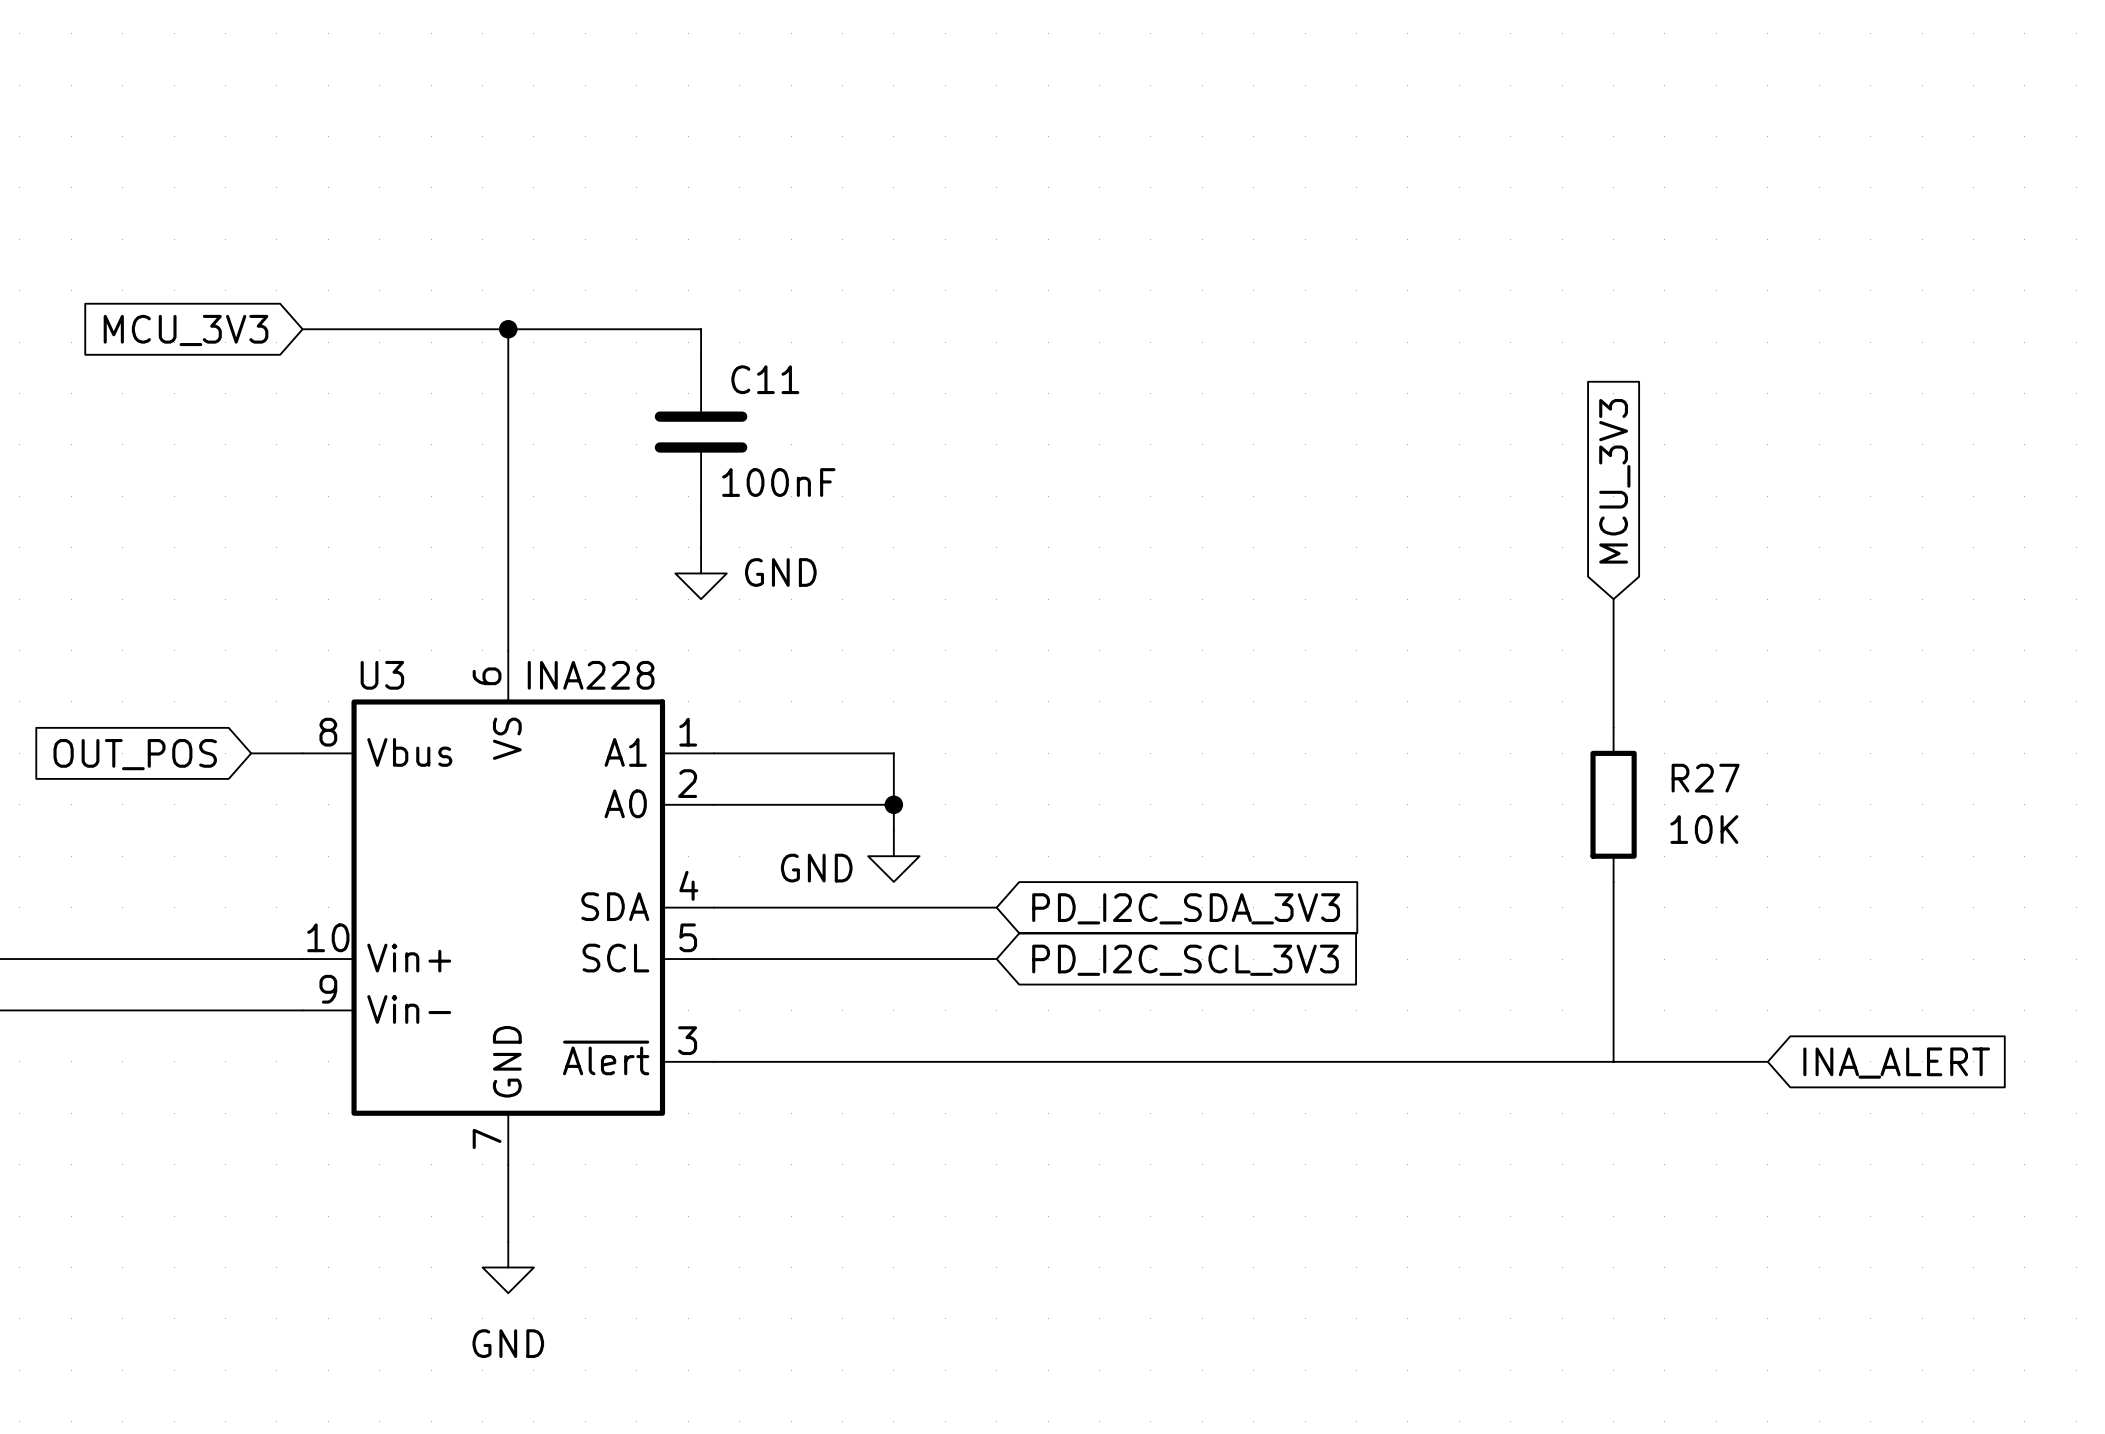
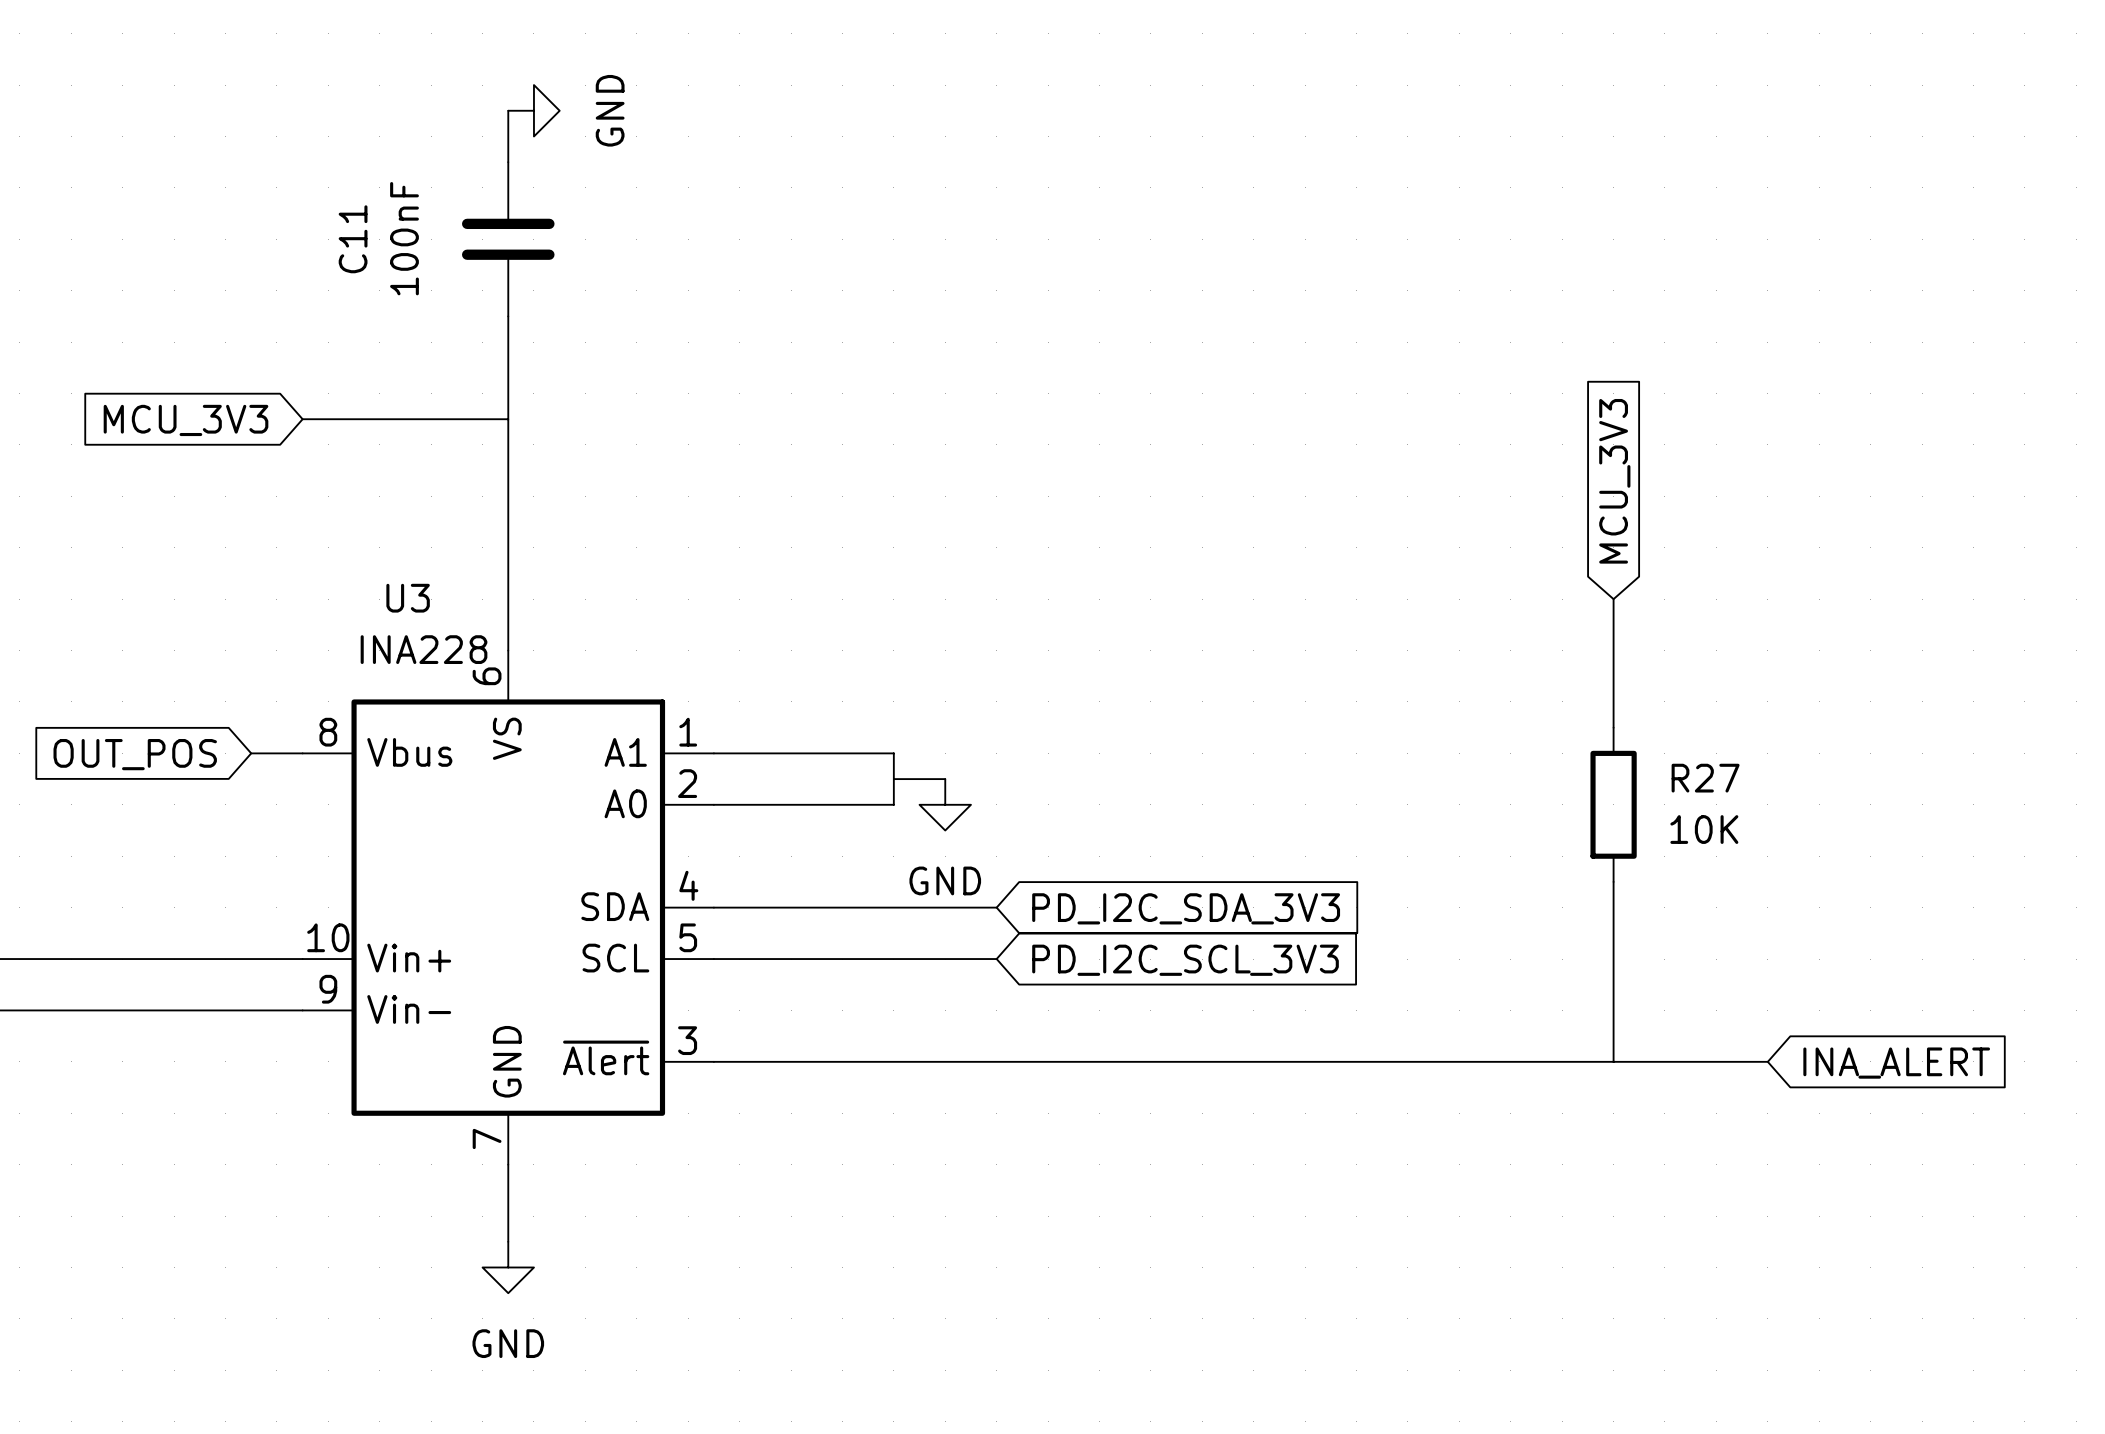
wire: none -> (508, 110) (508, 162)
power symbol: none -> GND (533, 110)
wire: (302, 329) (701, 329) (701, 354) -> none
junction: (508, 329) -> none
global label position: MCU_3V3 (186, 330) -> MCU_3V3 (186, 420)
C11 name rotation: 0° (765, 379) -> 90° counterclockwise (353, 239)
C11 name position: C11 (765, 379) -> C11 (353, 239)
wire: none -> (302, 419) (508, 419)
C11 position: (701, 432) -> (508, 239)
C11 value rotation: 0° (778, 482) -> 90° counterclockwise (404, 238)
C11 value position: 100nF (778, 482) -> 100nF (404, 238)
wire: (701, 509) (701, 547) -> none
power symbol: GND (701, 573) -> none
U3 name position: U3 (382, 675) -> U3 (408, 598)
U3 value position: INA228 (591, 675) -> INA228 (424, 649)
wire: none -> (893, 779) (945, 779)
wire: (893, 804) (893, 830) -> none
junction: (893, 804) -> none
power symbol position: GND (893, 856) -> GND (945, 804)
power symbol text position: GND (816, 868) -> GND (945, 880)

